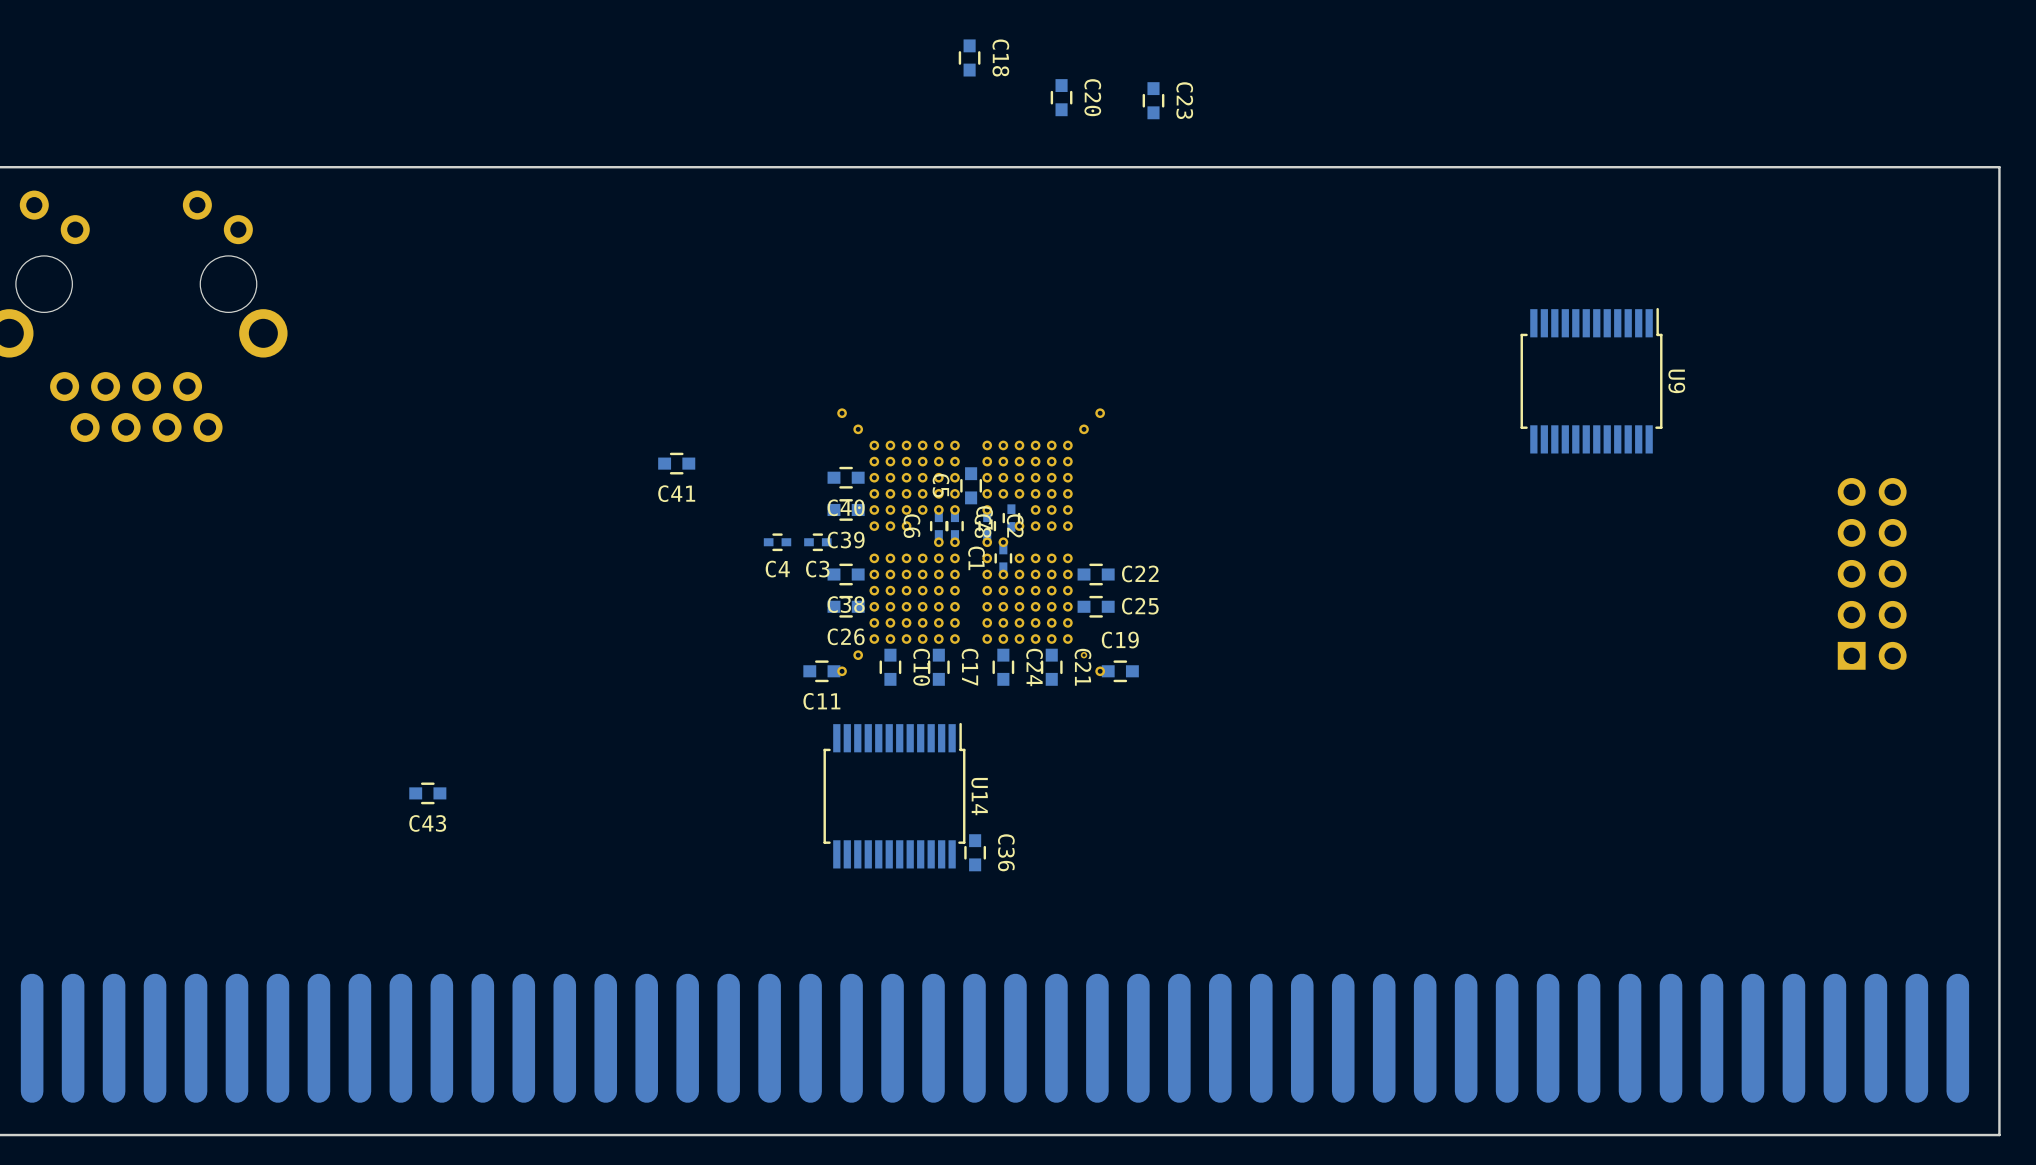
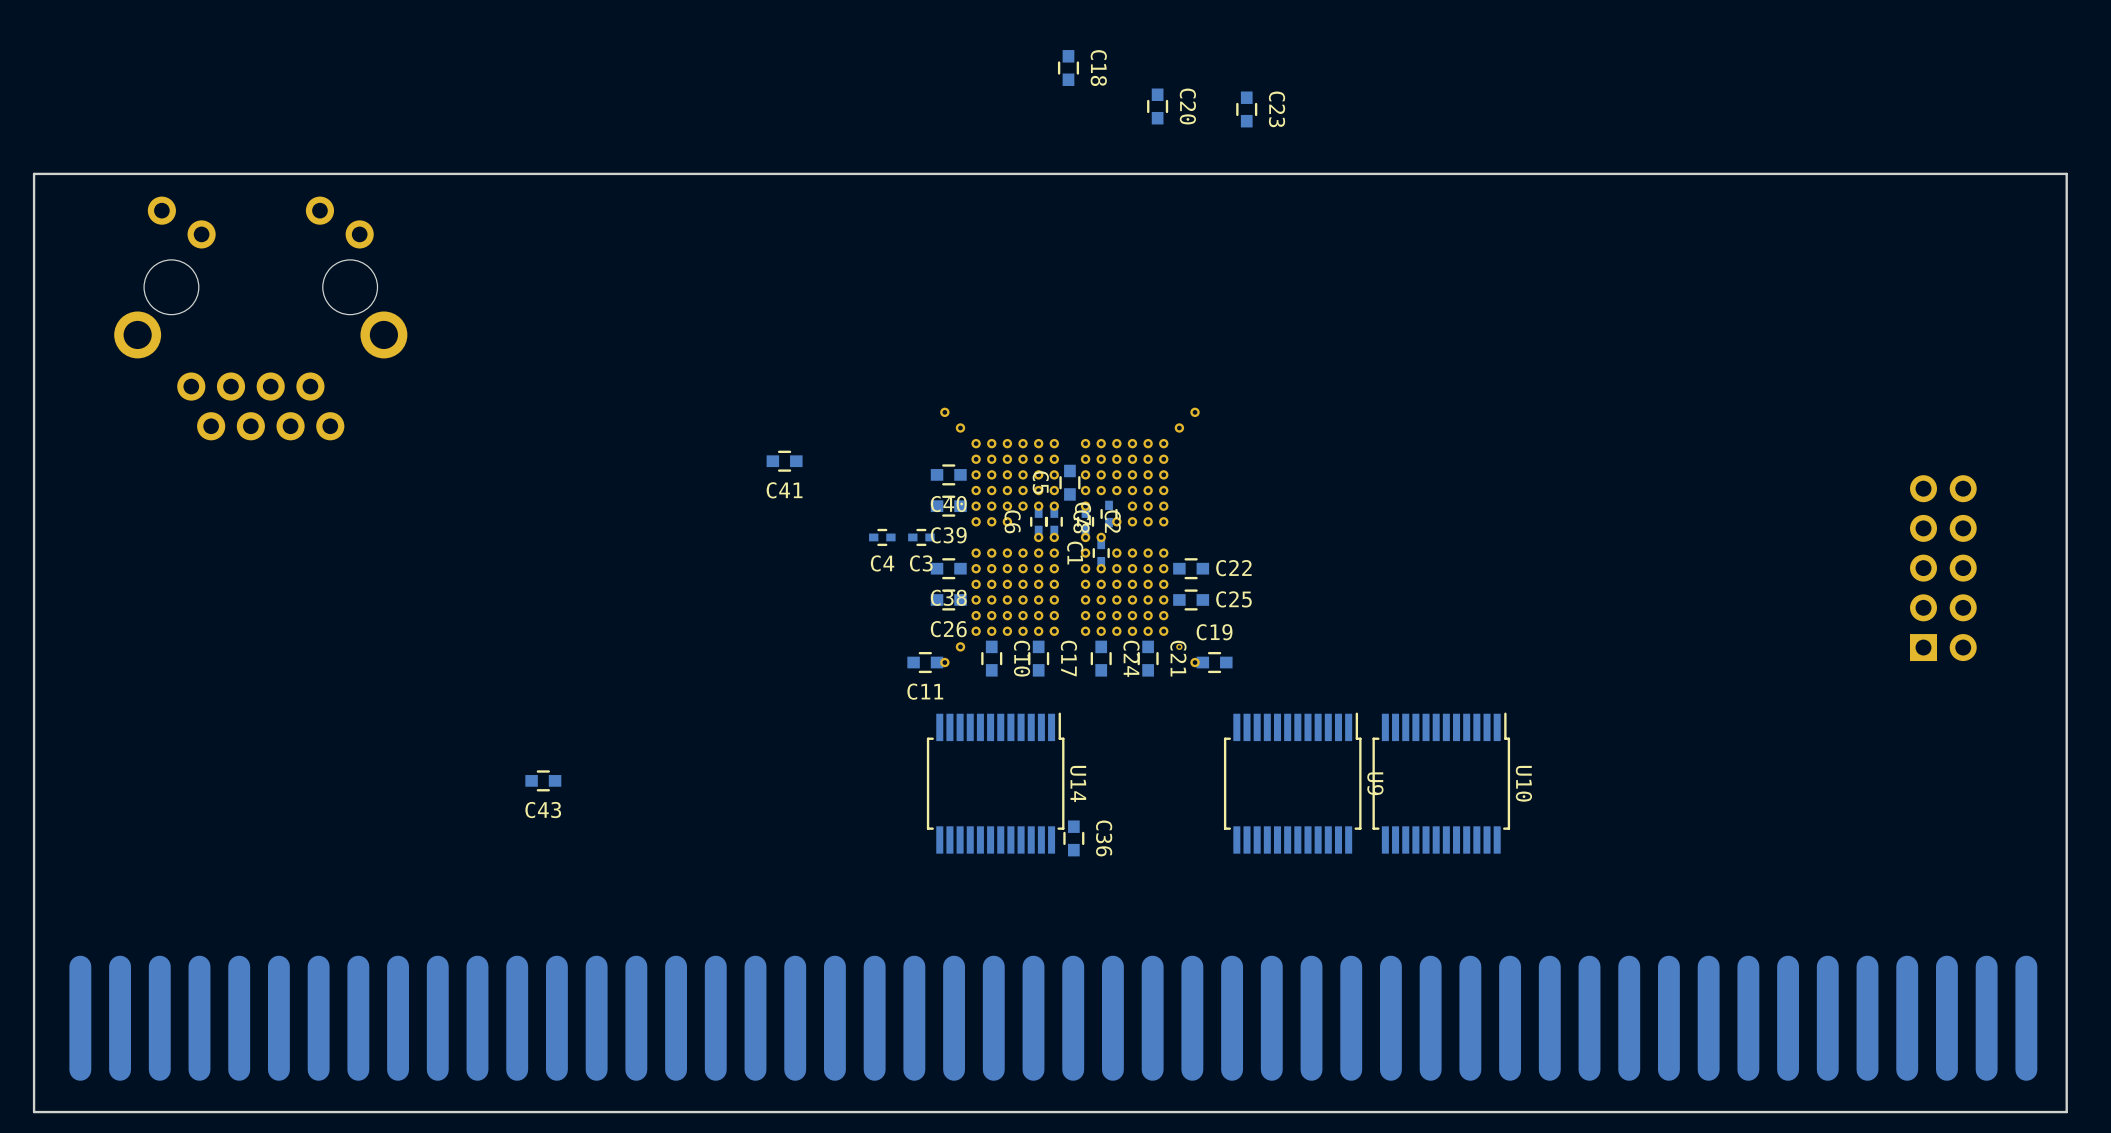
U9 position: (1591, 380) -> (1292, 783)
U10: none -> (1441, 783)

